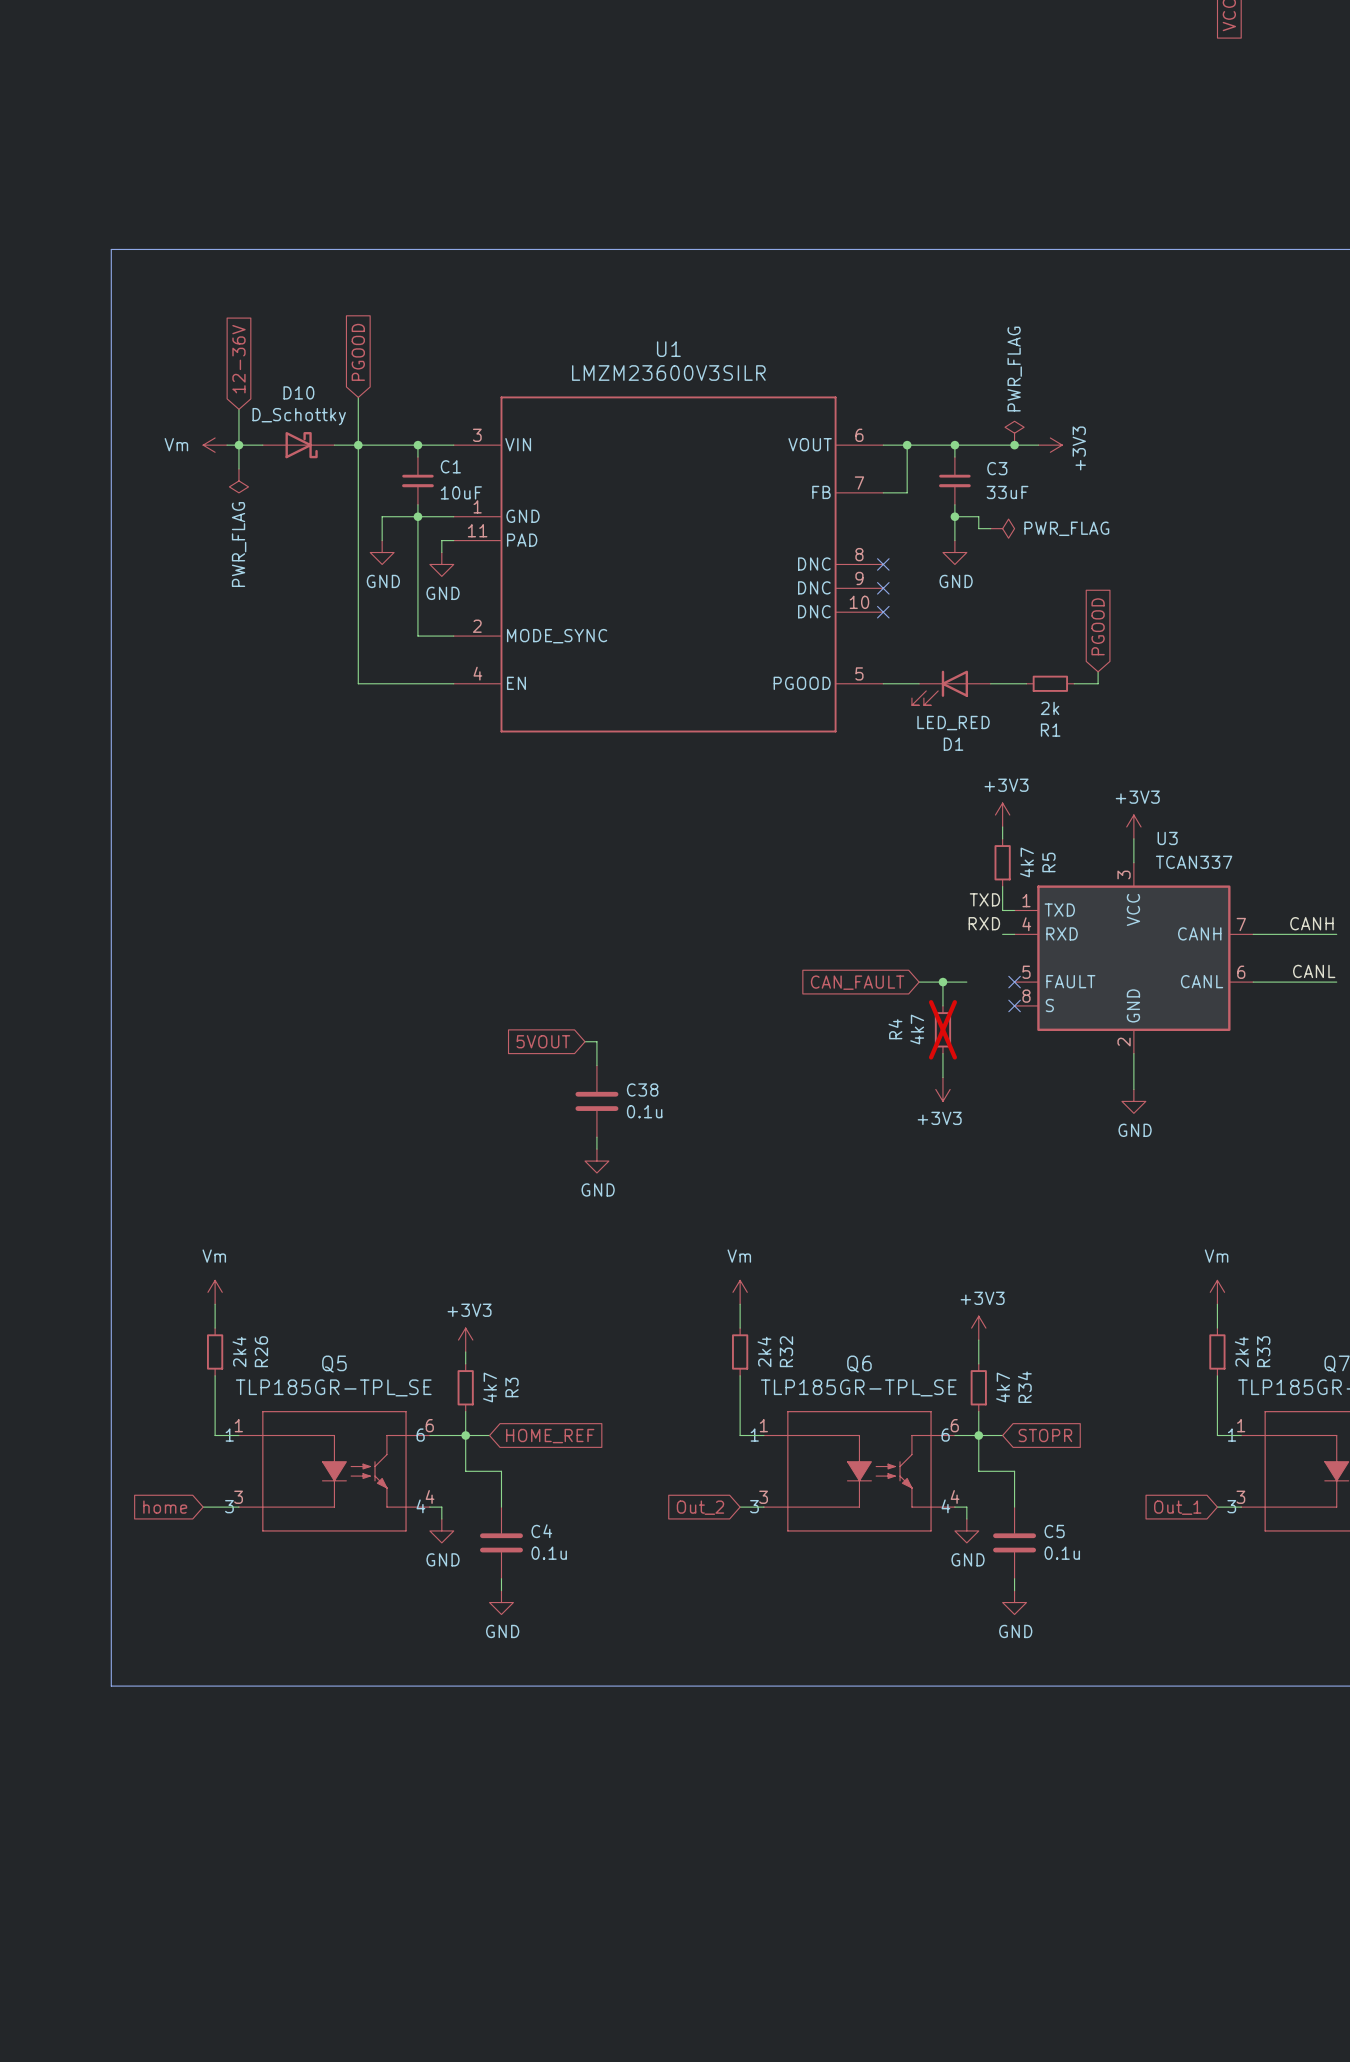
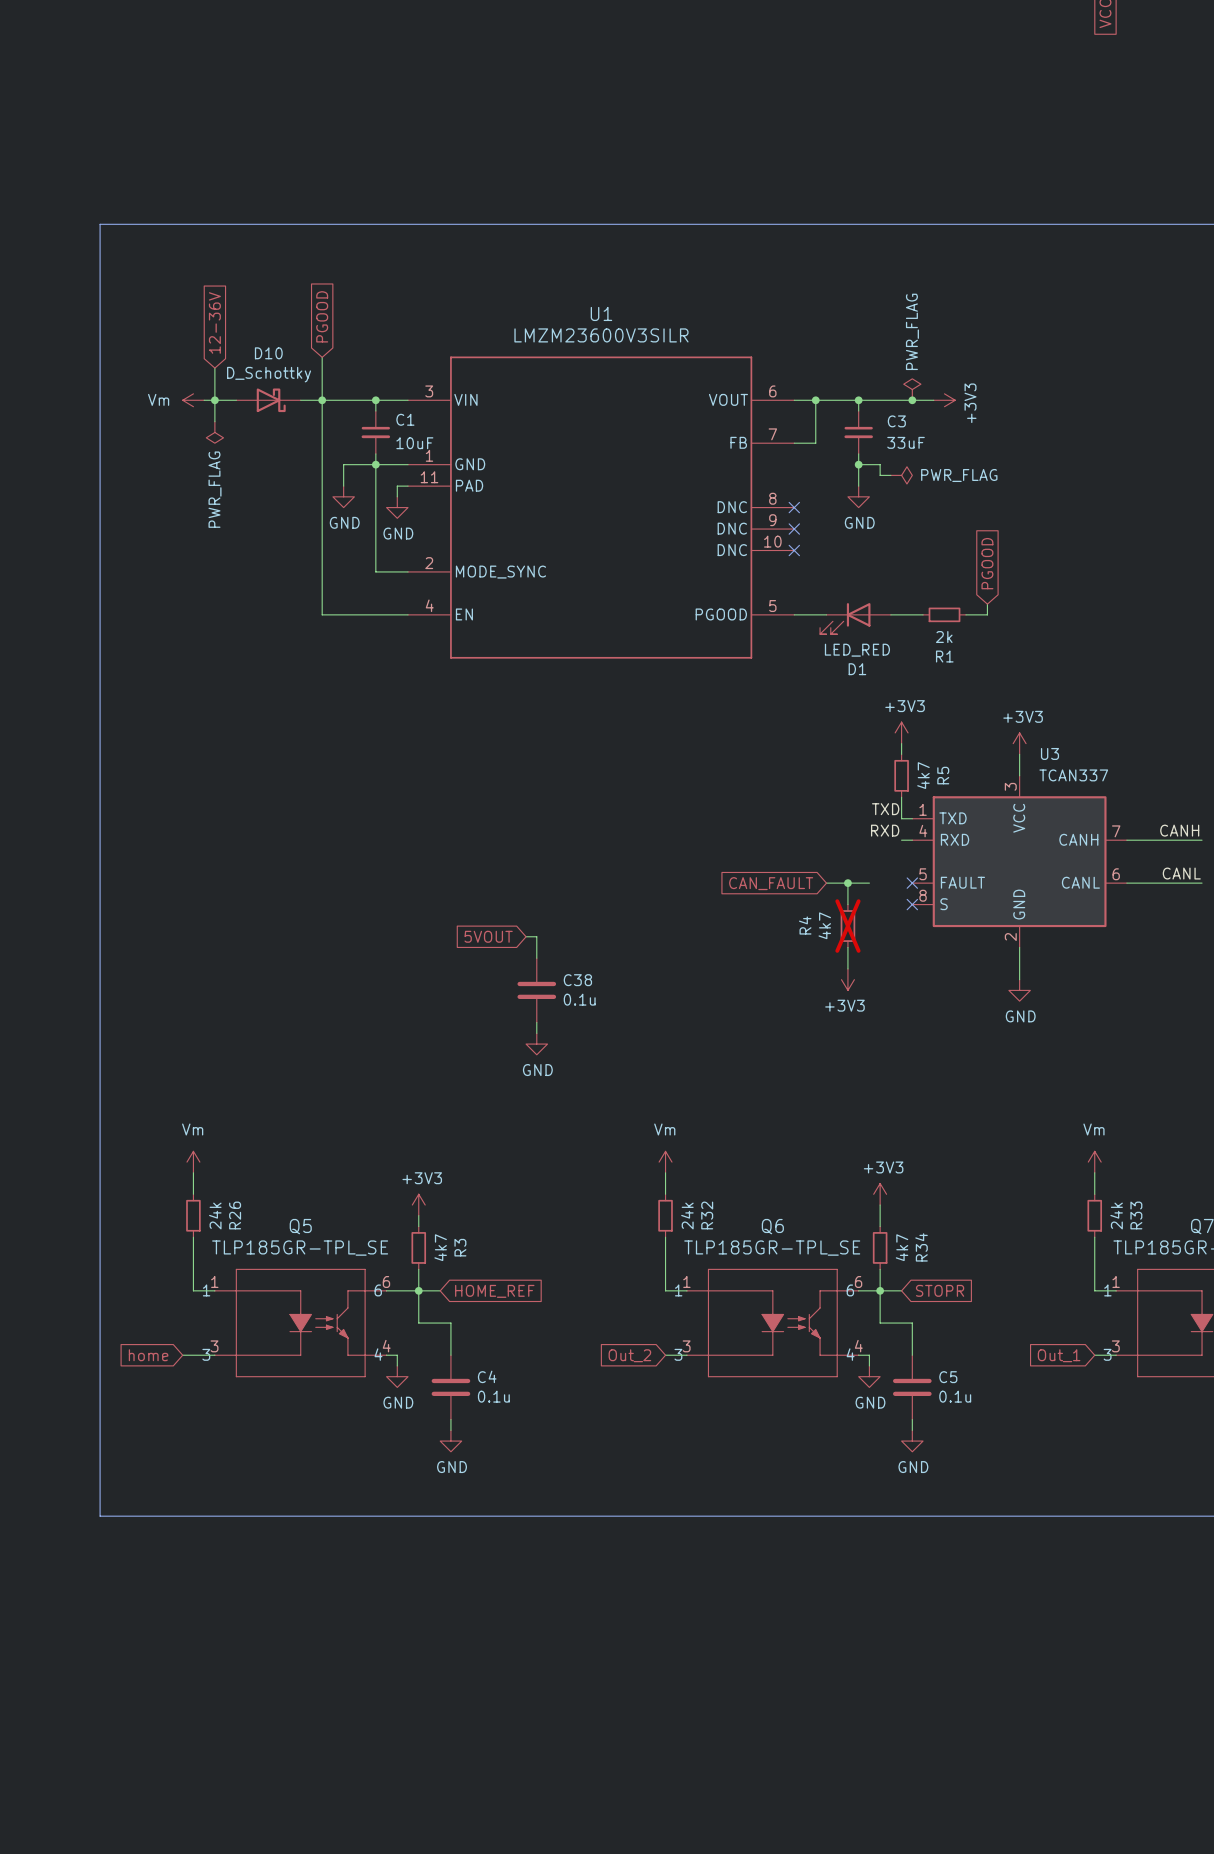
R26 value: 2k4 (239, 1351) -> 24k (215, 1216)
R32 value: 2k4 (764, 1351) -> 24k (687, 1216)
R33 value: 2k4 (1241, 1351) -> 24k (1116, 1216)

